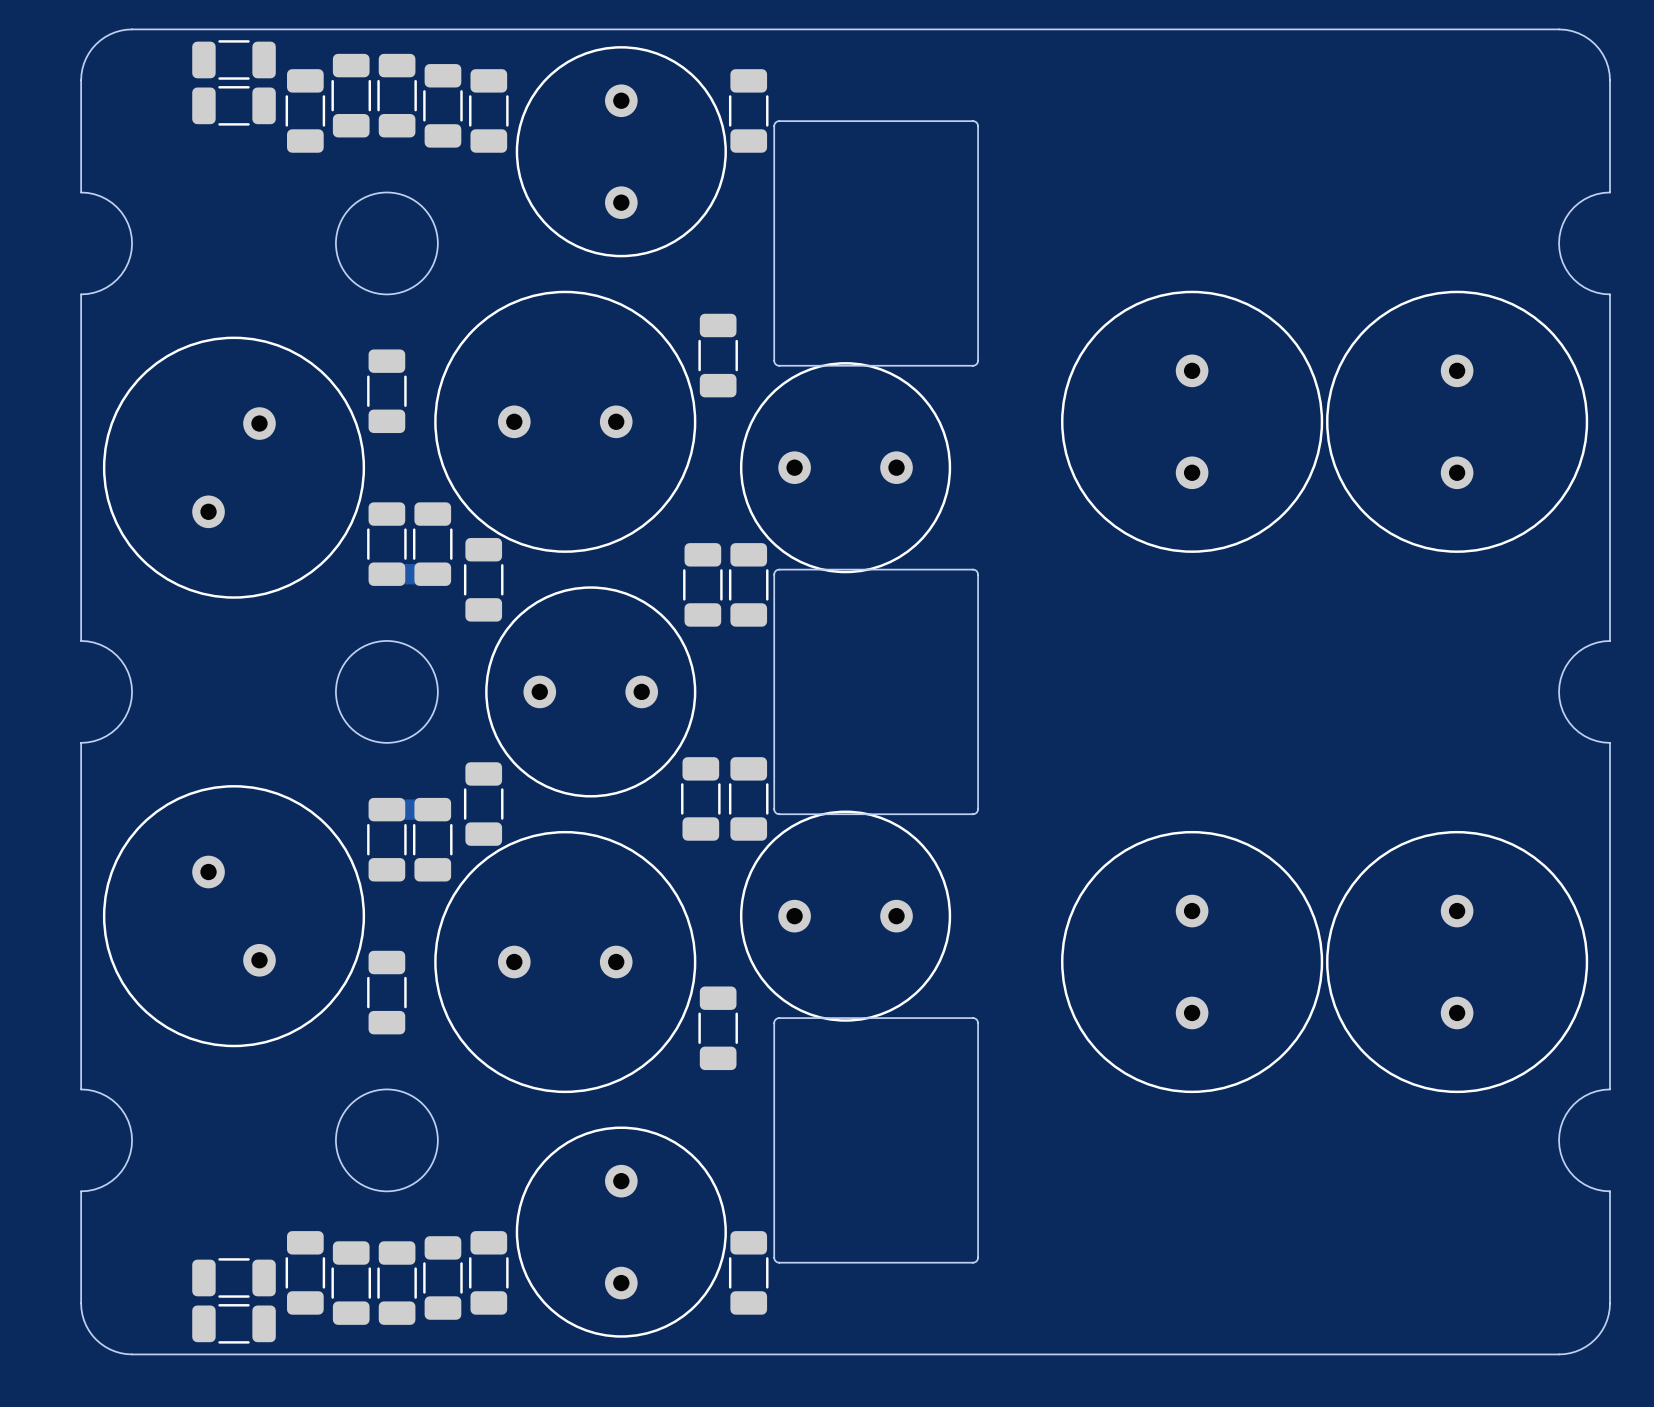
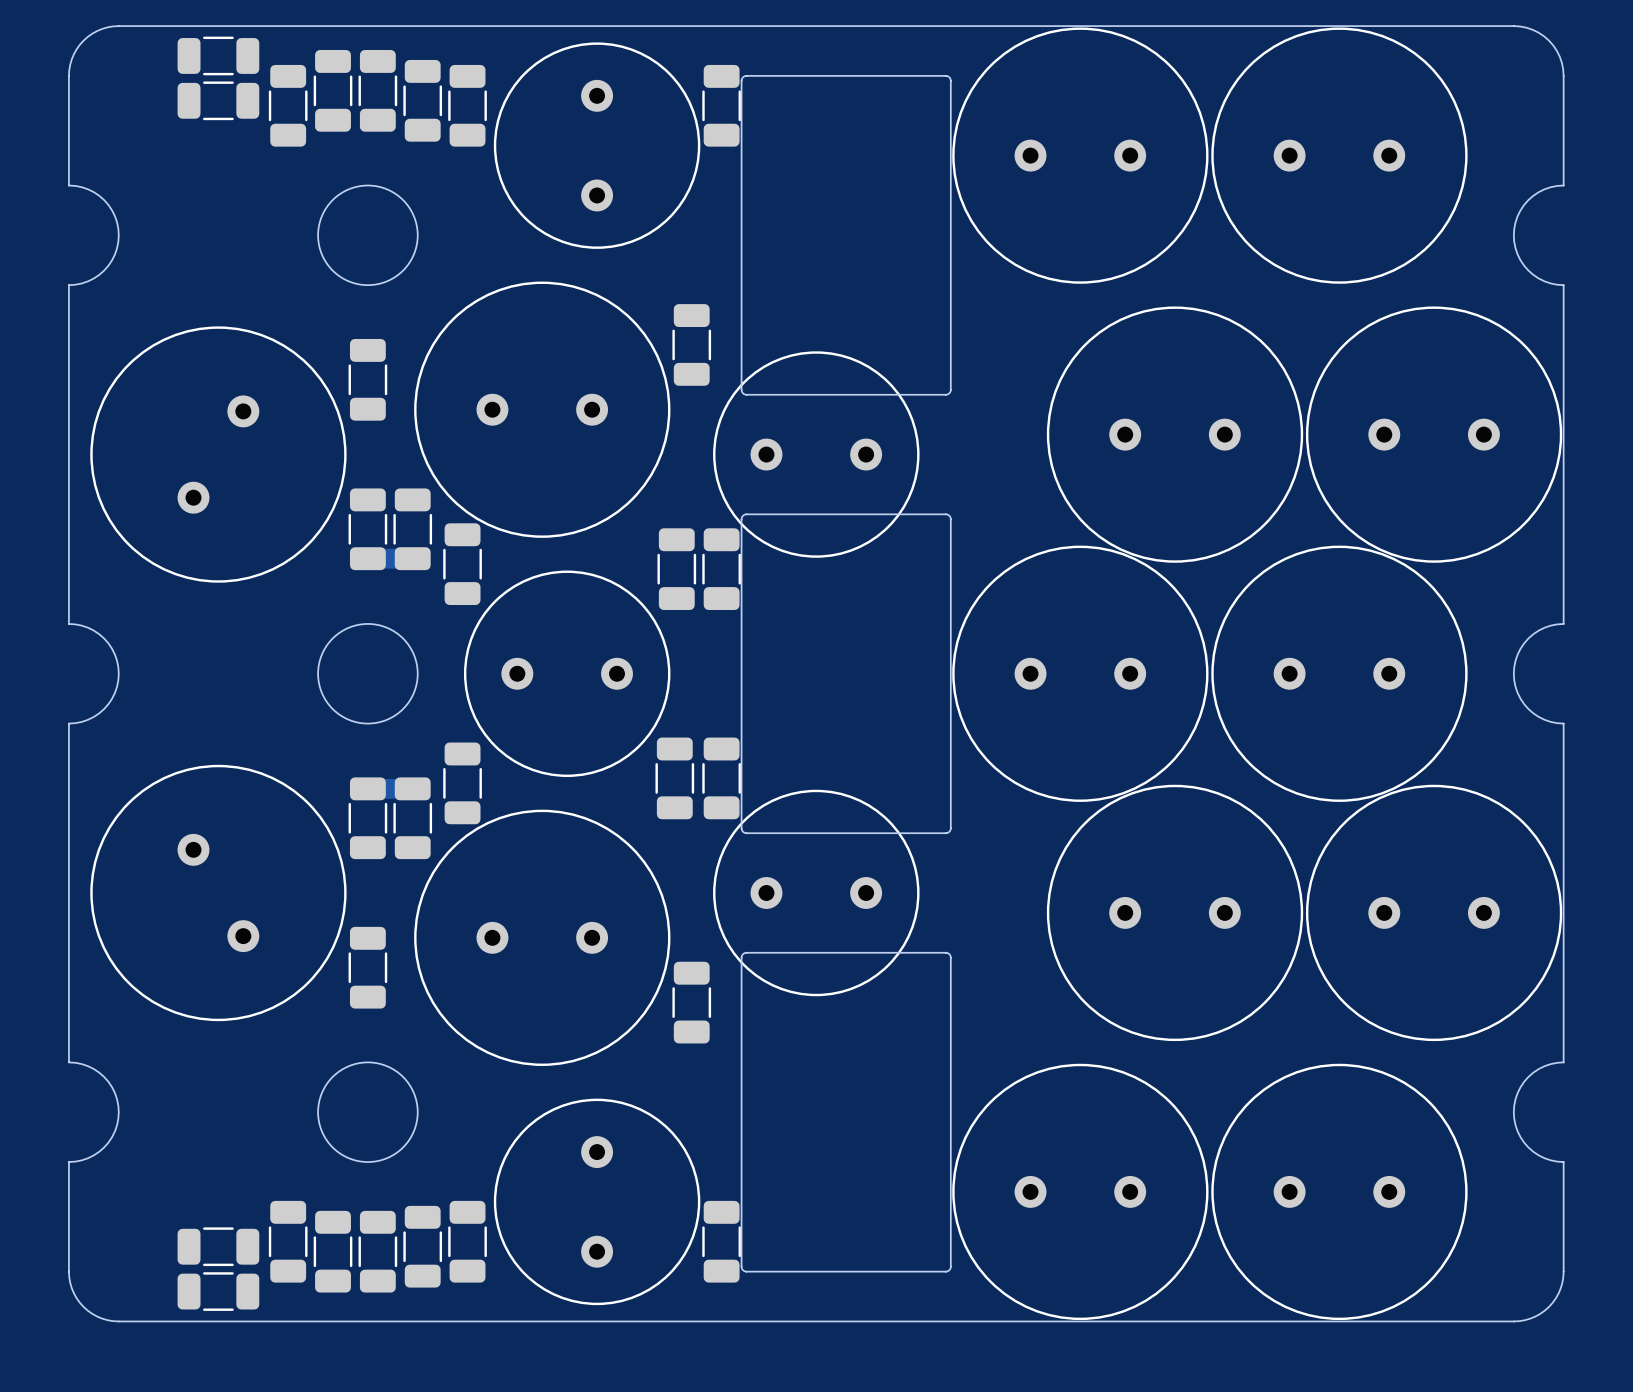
board edge: (779, 121) (972, 121) (976, 123) (978, 360) (976, 364) (779, 365) (775, 363) (774, 126) (779, 121) -> (746, 75) (741, 80) (742, 392) (746, 394) (948, 394) (950, 389) (950, 78) (945, 75) (746, 75)
part: none -> (1080, 155)
part: none -> (1339, 155)
part rotation: 0° (1192, 421) -> 90° clockwise (1175, 434)
part rotation: 0° (1457, 421) -> 90° clockwise (1434, 434)
board edge: (779, 569) (972, 569) (976, 571) (978, 809) (976, 813) (779, 814) (775, 812) (774, 574) (779, 569) -> (746, 514) (741, 519) (742, 830) (746, 833) (948, 832) (950, 828) (950, 516) (945, 514) (746, 514)
part: none -> (1080, 673)
part: none -> (1339, 673)
part rotation: 0° (1192, 962) -> 90° clockwise (1175, 912)
part rotation: 0° (1457, 962) -> 90° clockwise (1434, 912)
board edge: (779, 1018) (972, 1018) (976, 1019) (978, 1257) (976, 1261) (779, 1262) (775, 1260) (774, 1023) (779, 1018) -> (746, 952) (741, 957) (742, 1269) (746, 1271) (948, 1270) (950, 1266) (950, 955) (945, 952) (746, 952)
part: none -> (1080, 1191)
part: none -> (1339, 1191)

